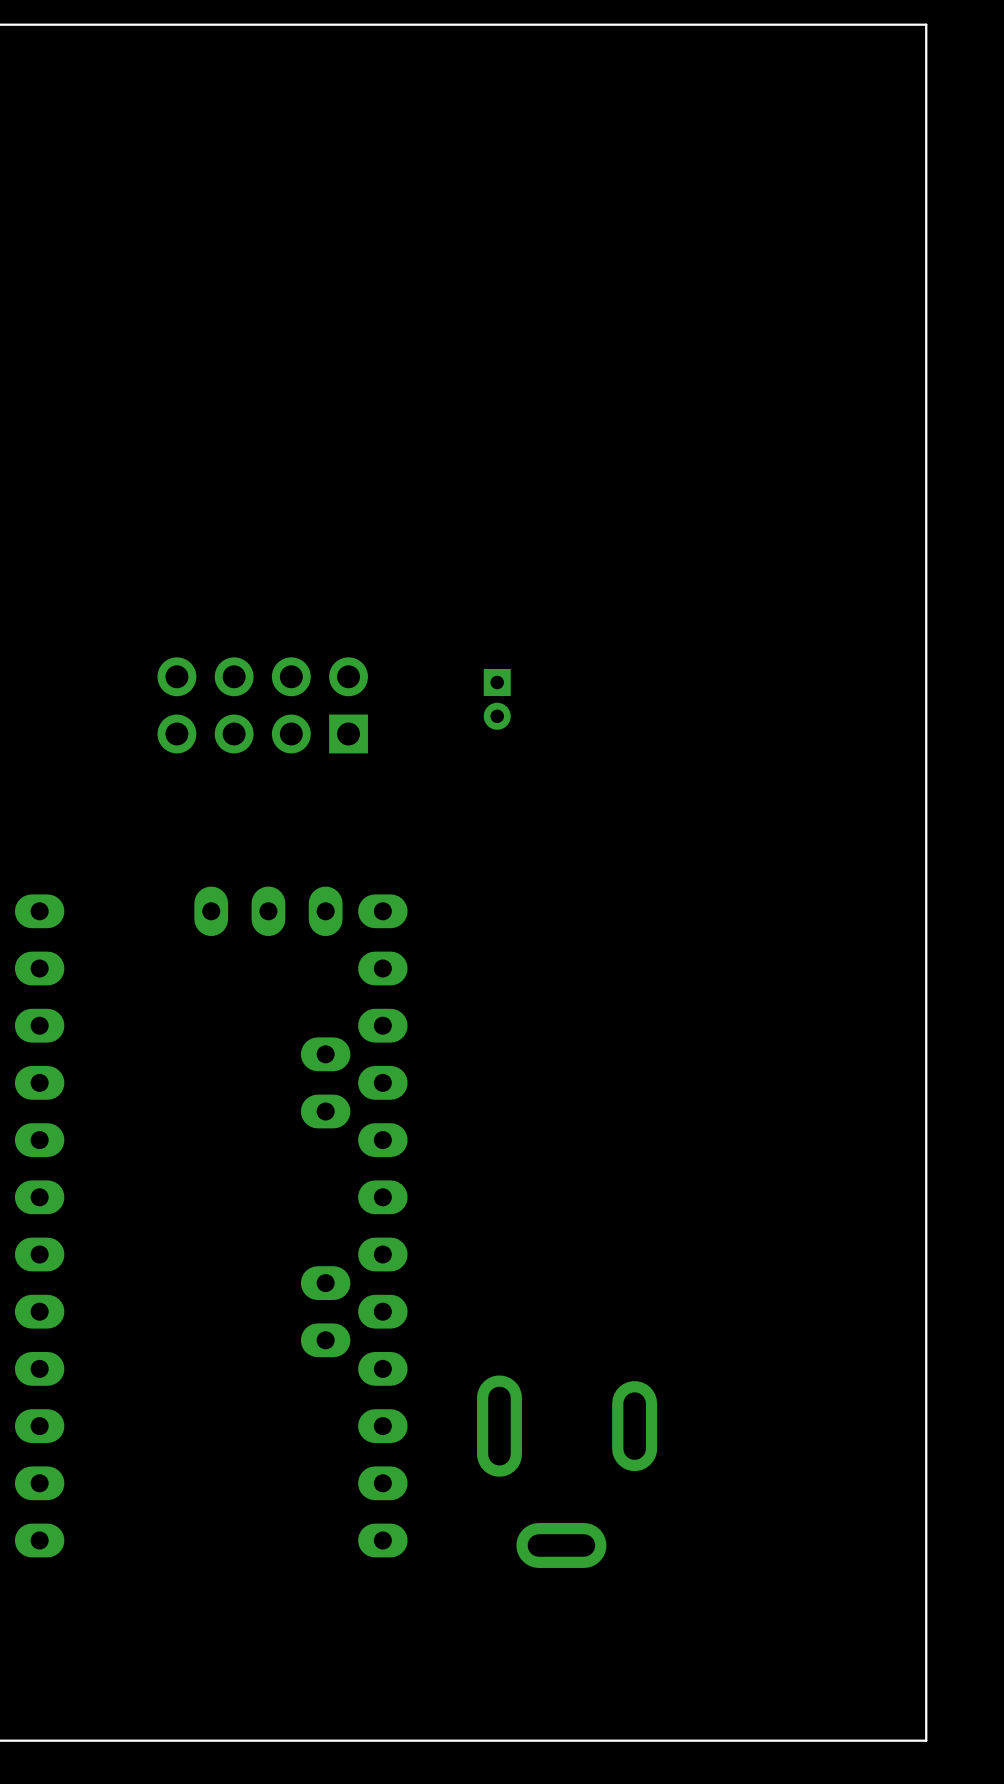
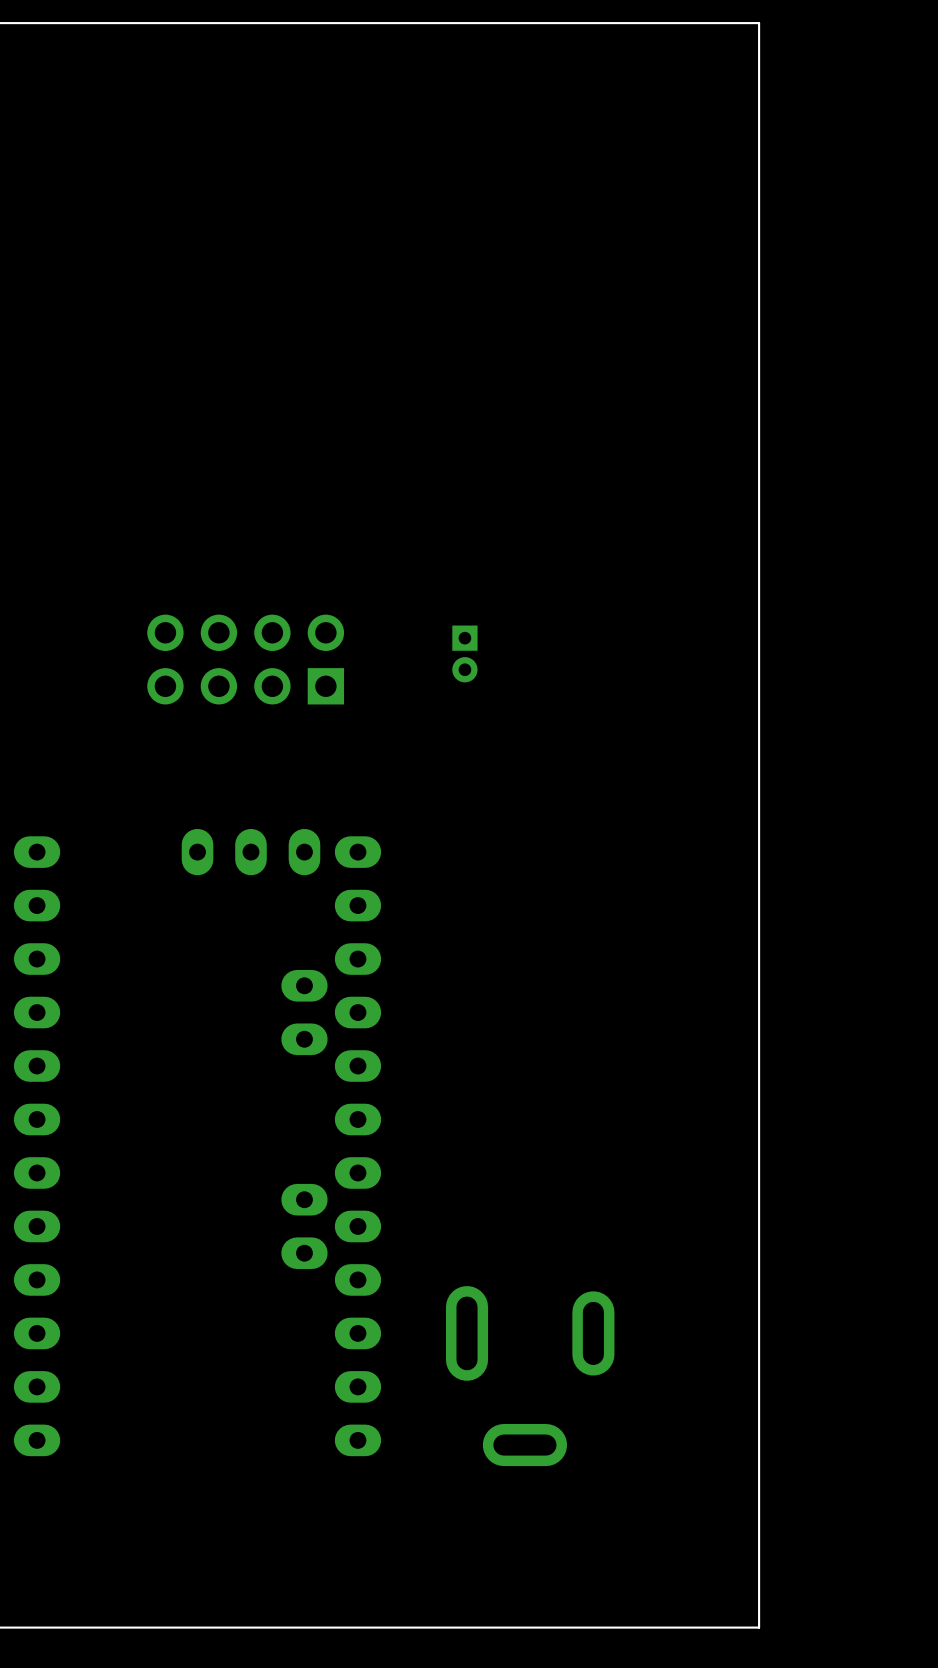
board edge: (811, 24) (926, 24) (926, 1740) (811, 1740) -> (759, 23) (759, 1627)

